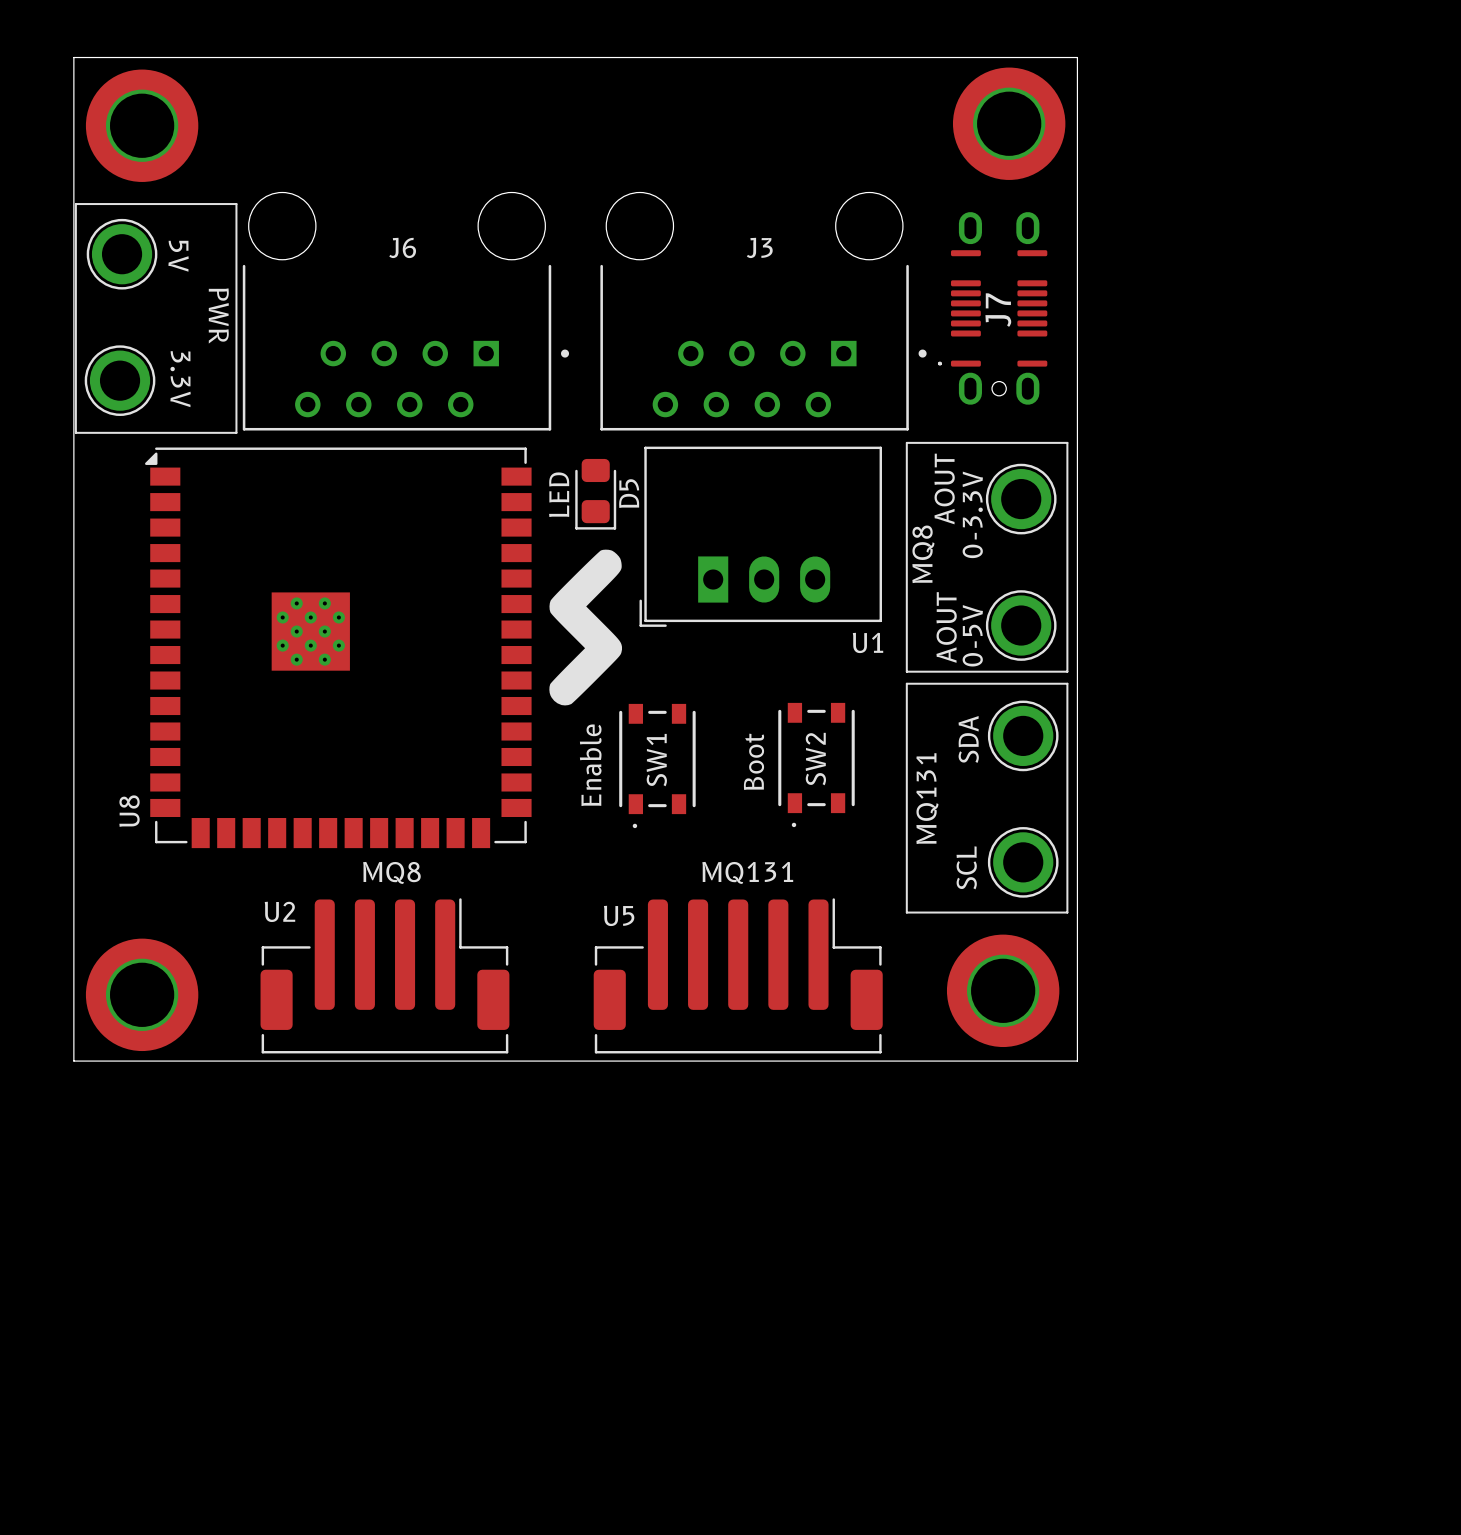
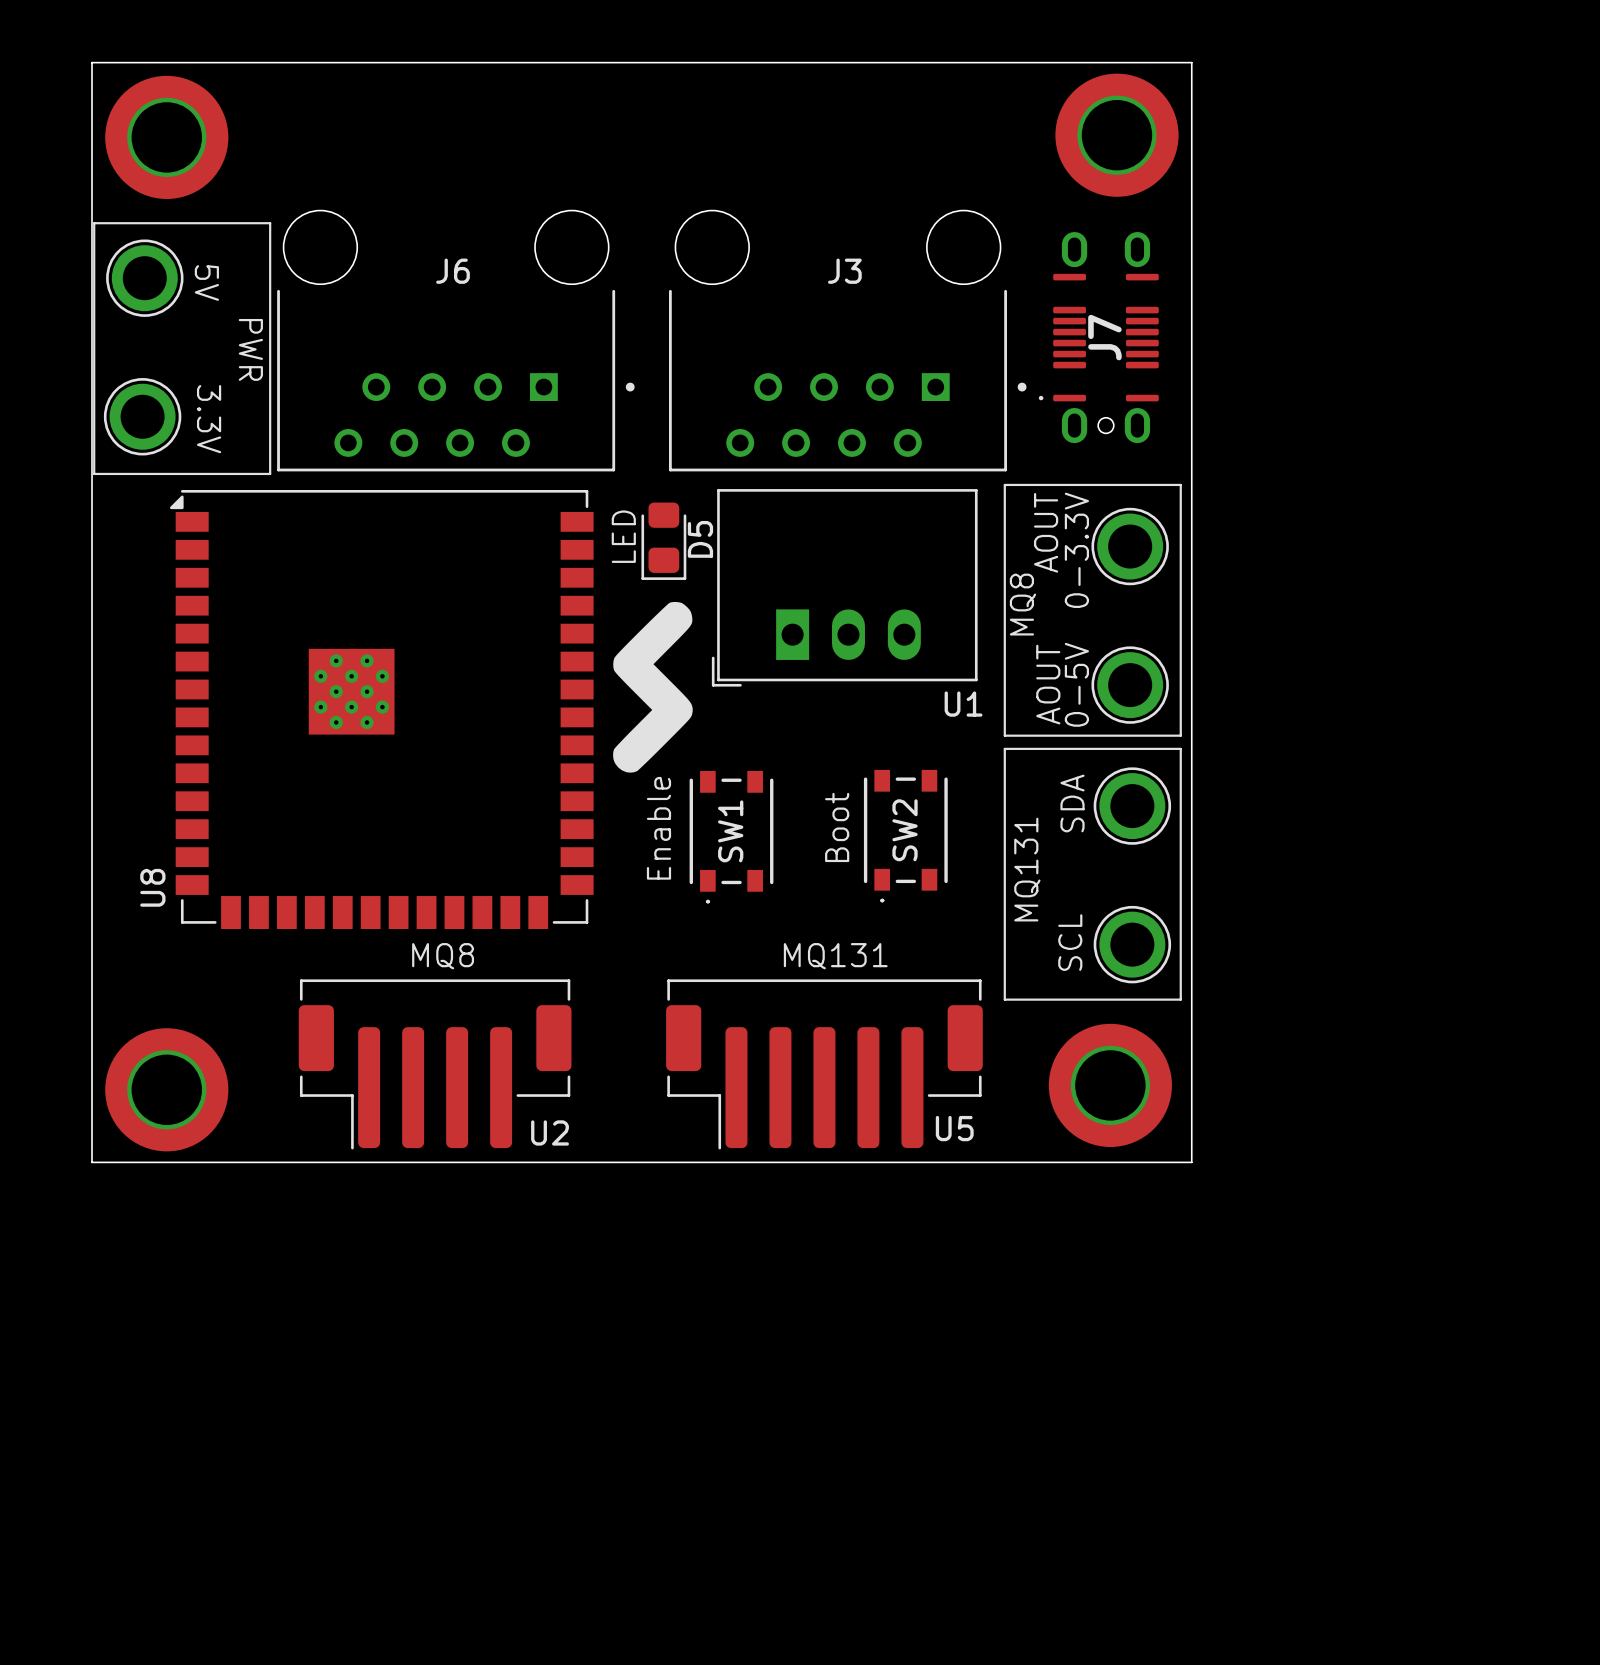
U2 rotation: 0° (384, 975) -> 180° (435, 1064)
U5 rotation: 0° (738, 975) -> 180° (824, 1064)

